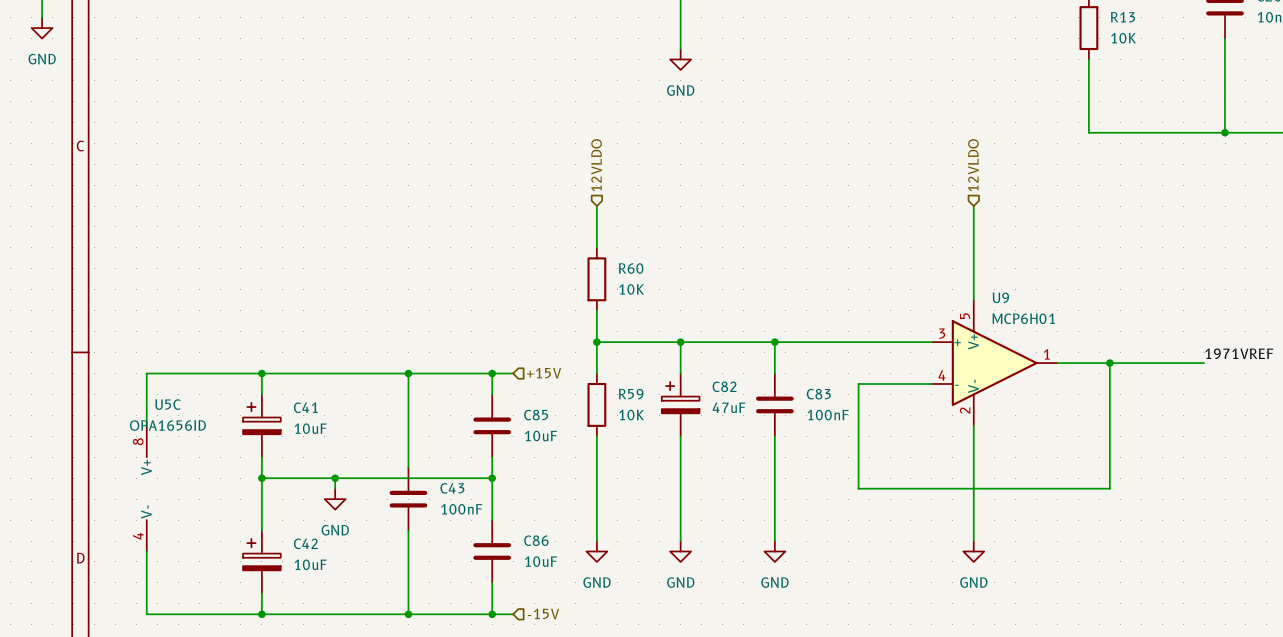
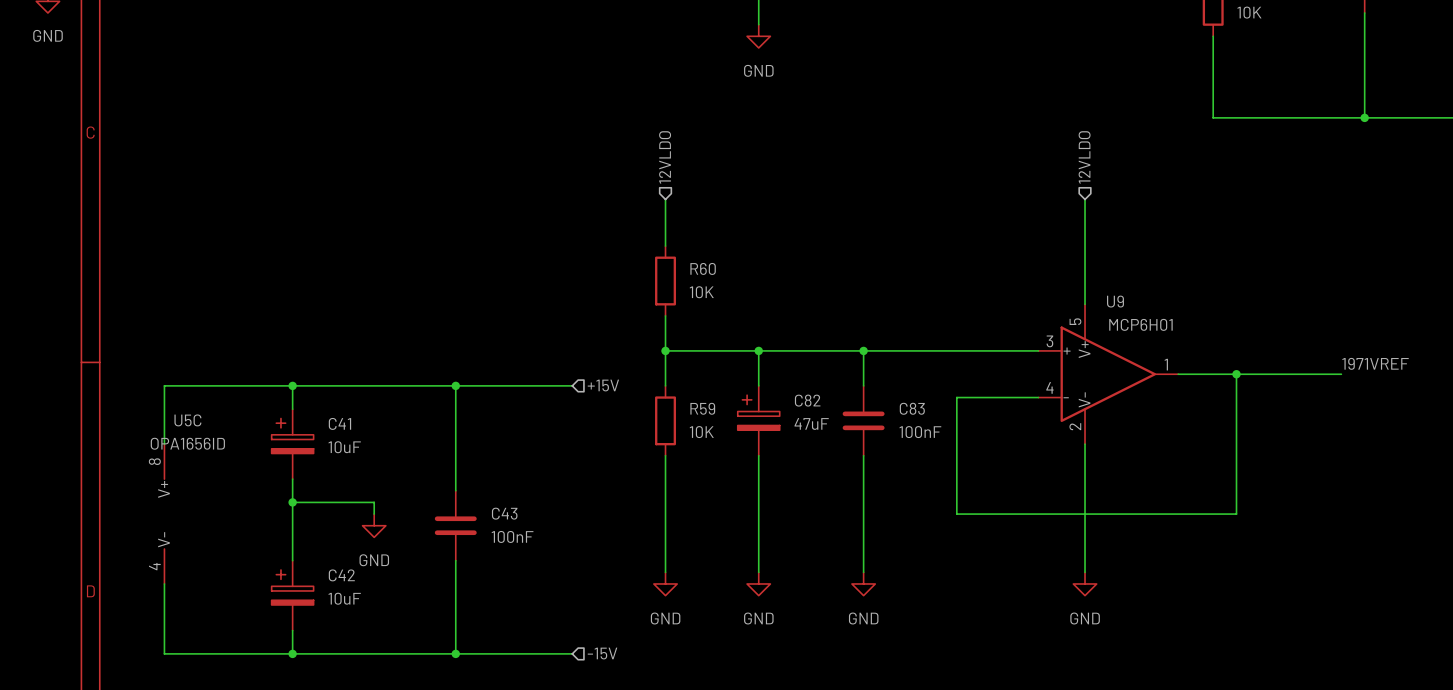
wire: (492, 373) (492, 394) -> none
junction: (492, 373) -> none
C85: 10uF (492, 425) -> none
wire: (492, 457) (492, 520) -> none
wire: (335, 478) (492, 478) -> none
junction: (335, 478) -> none
junction: (492, 478) -> none
C86: 10uF (492, 551) -> none
wire: (492, 582) (492, 614) -> none
junction: (492, 614) -> none

